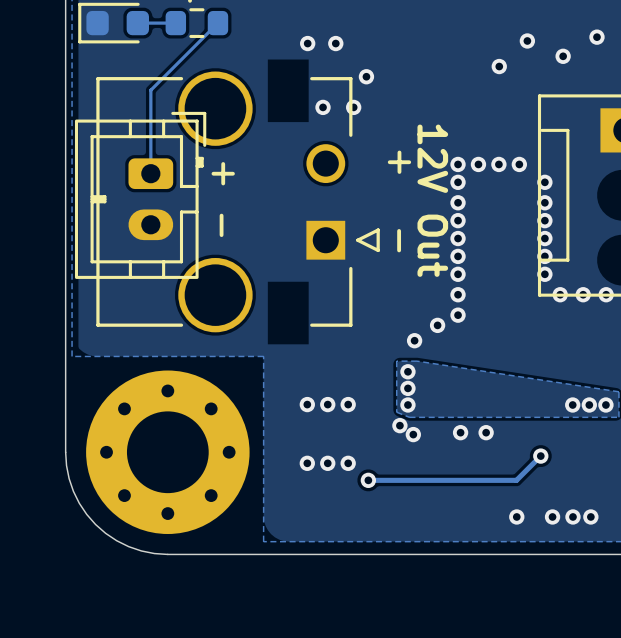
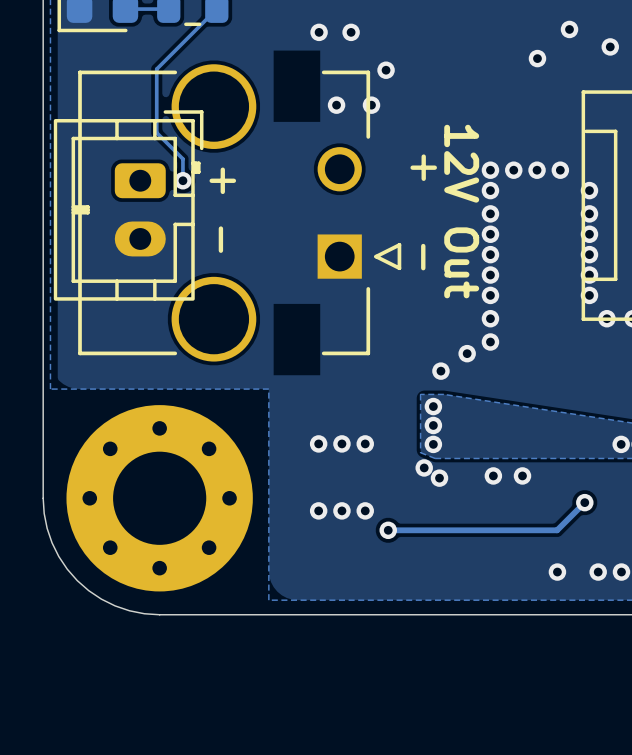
track: (165, 75) (150, 90) (150, 173) -> (156, 69) (156, 132) (182, 159) (182, 180)
via: none -> (182, 180)

